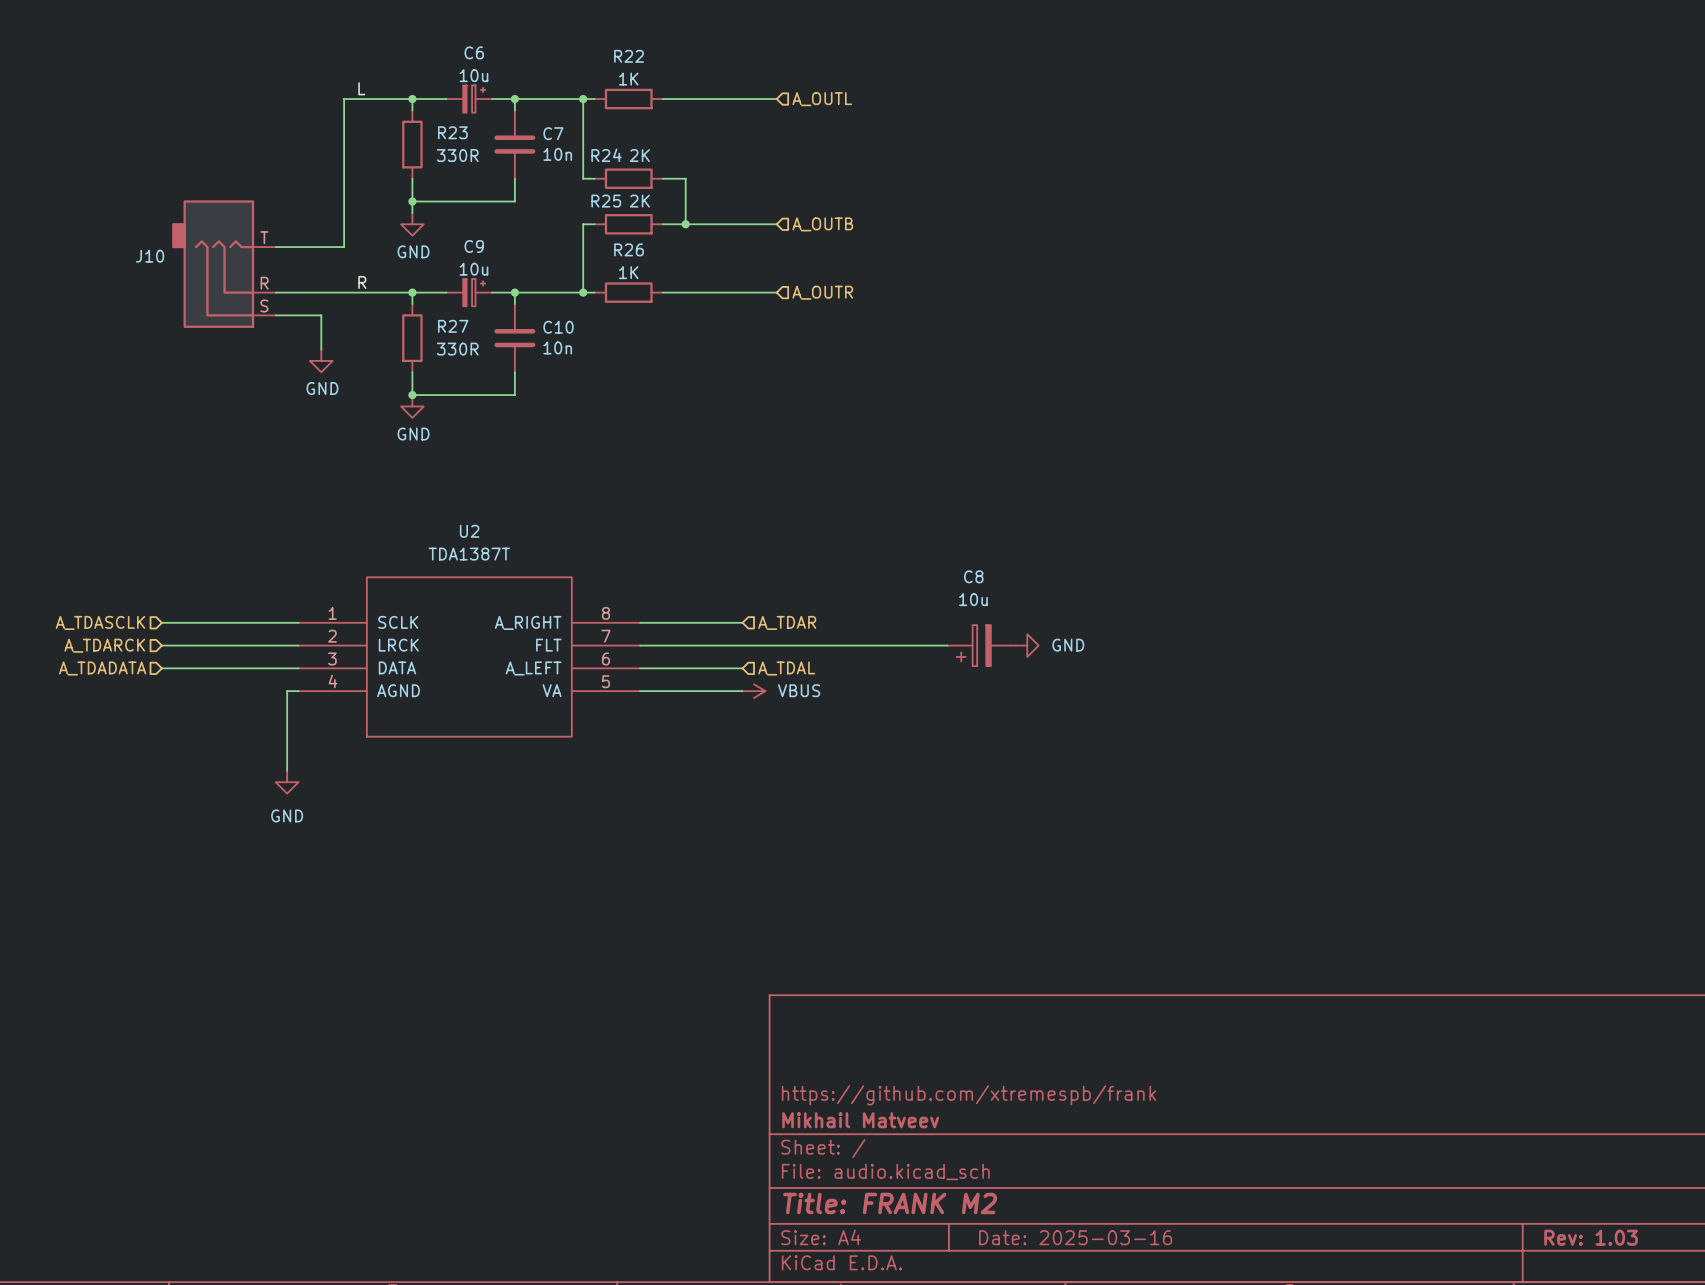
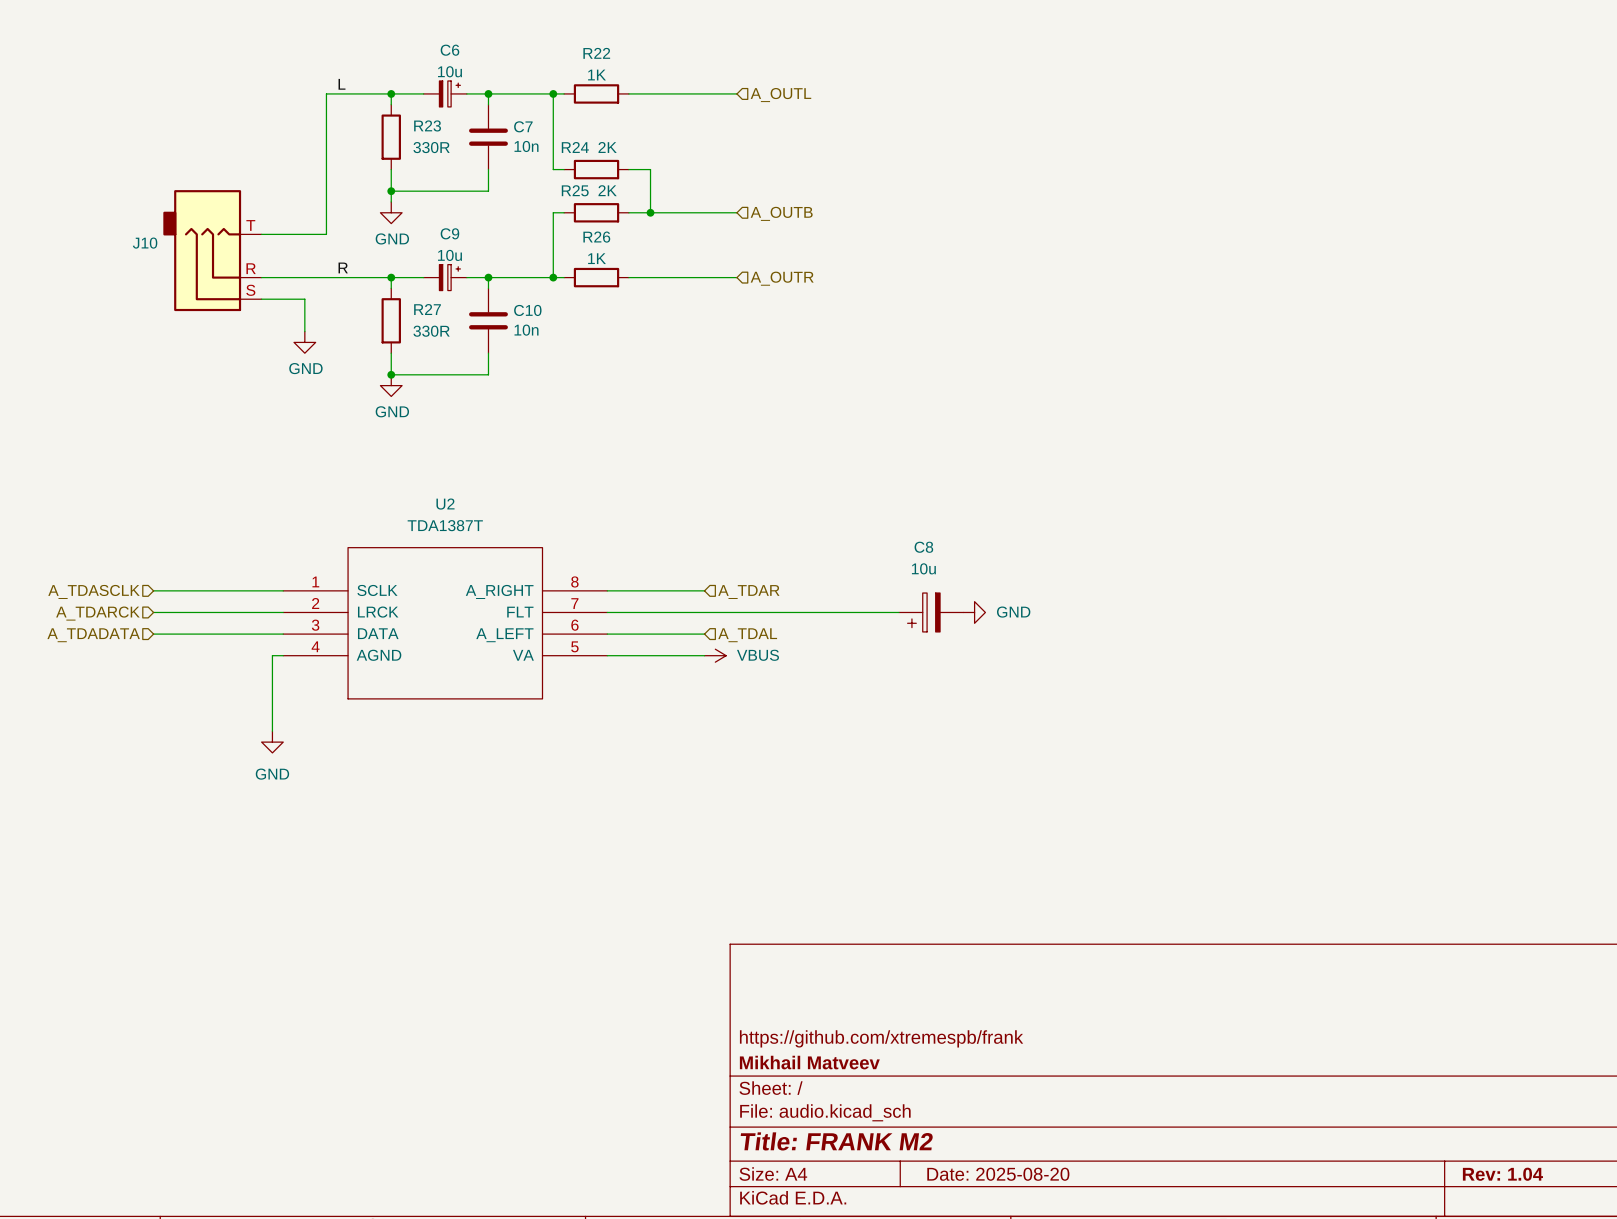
title block: Date: 2025-03-16 (1075, 1237) -> Date: 2025-08-20 (998, 1174)
title block: Rev: 1.03 (1591, 1237) -> Rev: 1.04 (1502, 1174)

